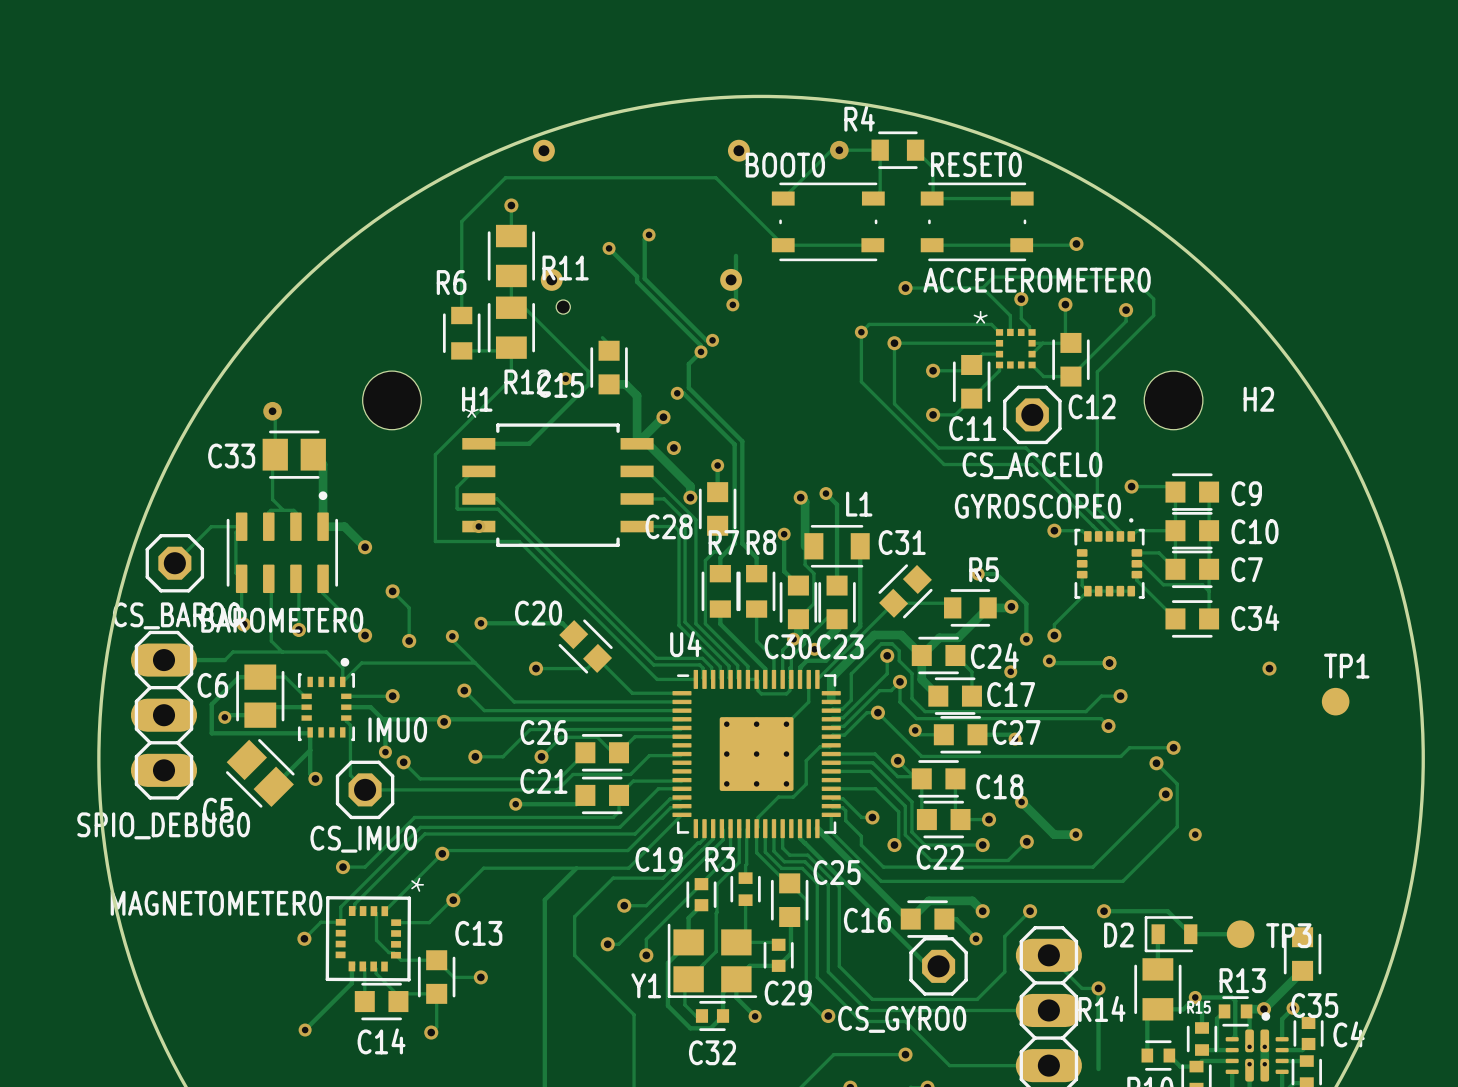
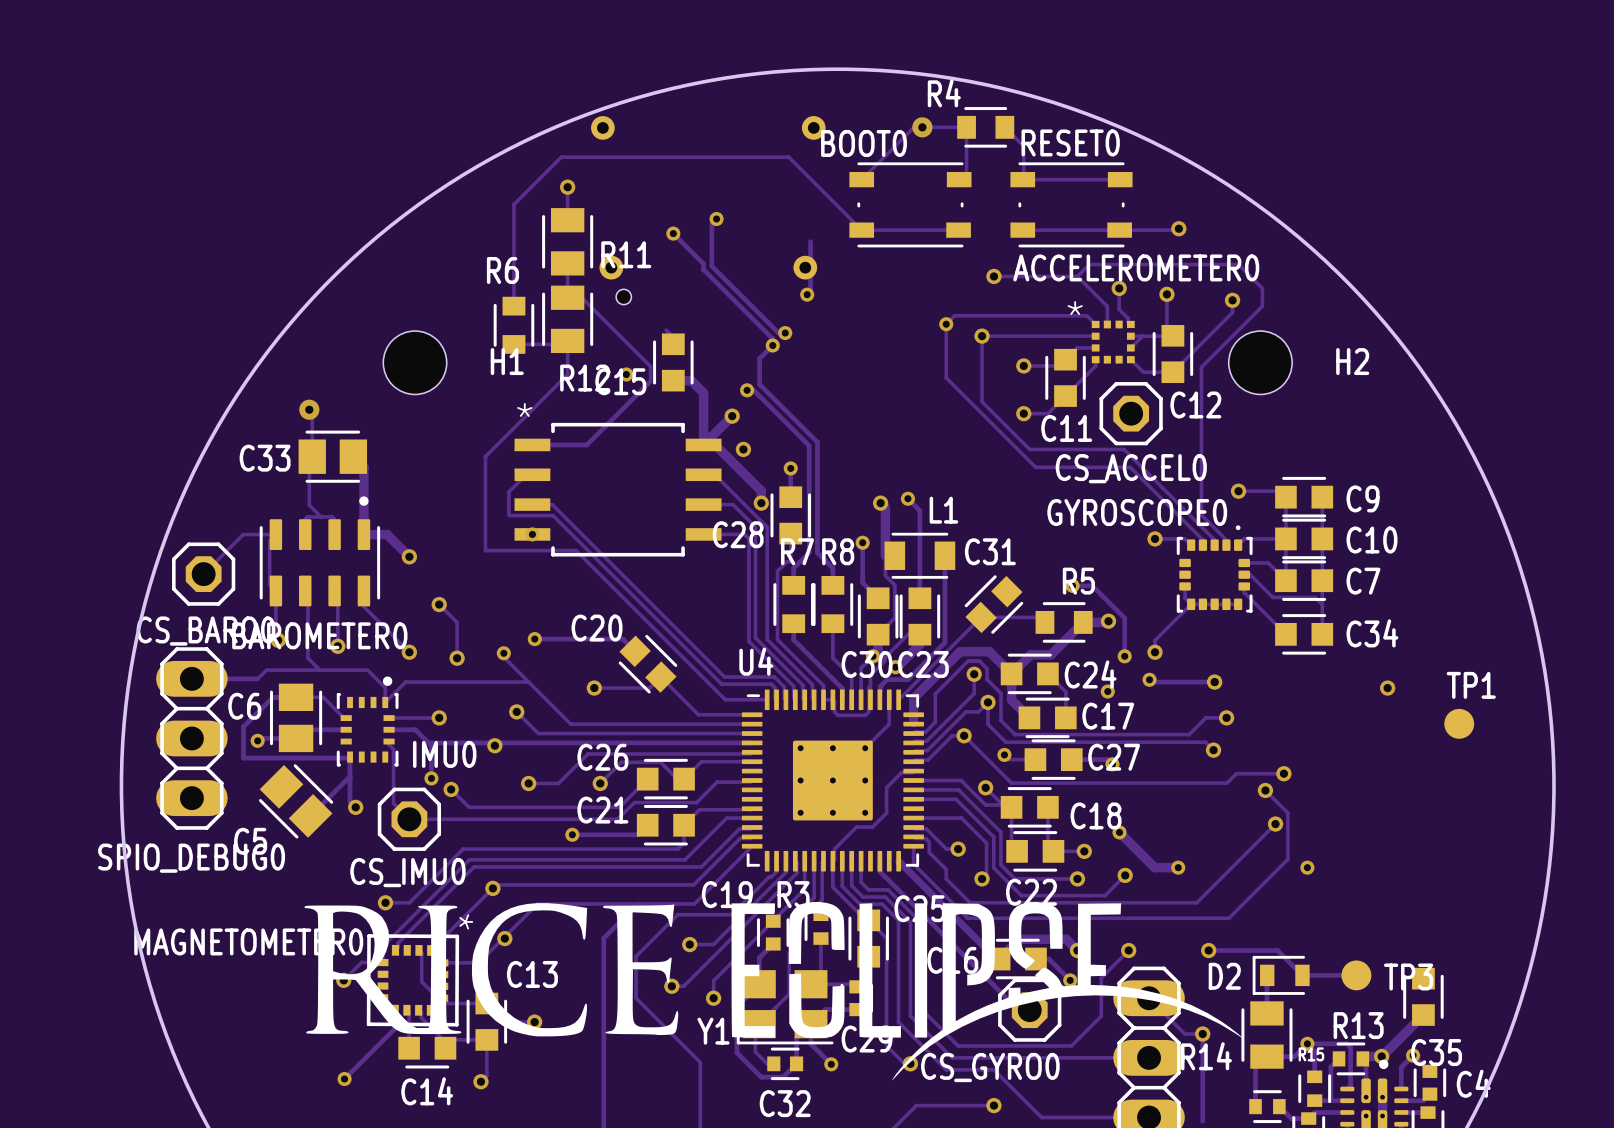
H1 position: (391, 400) -> (415, 362)
H2 position: (1173, 400) -> (1260, 362)
drawing: none -> [304, 901, 1243, 1081]

